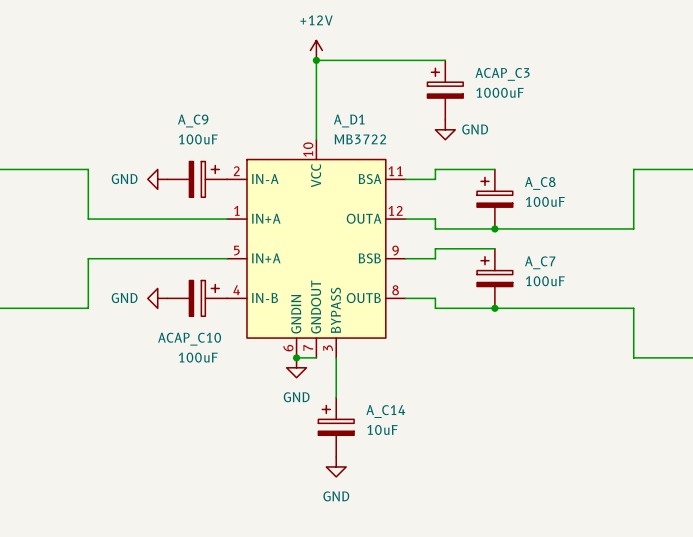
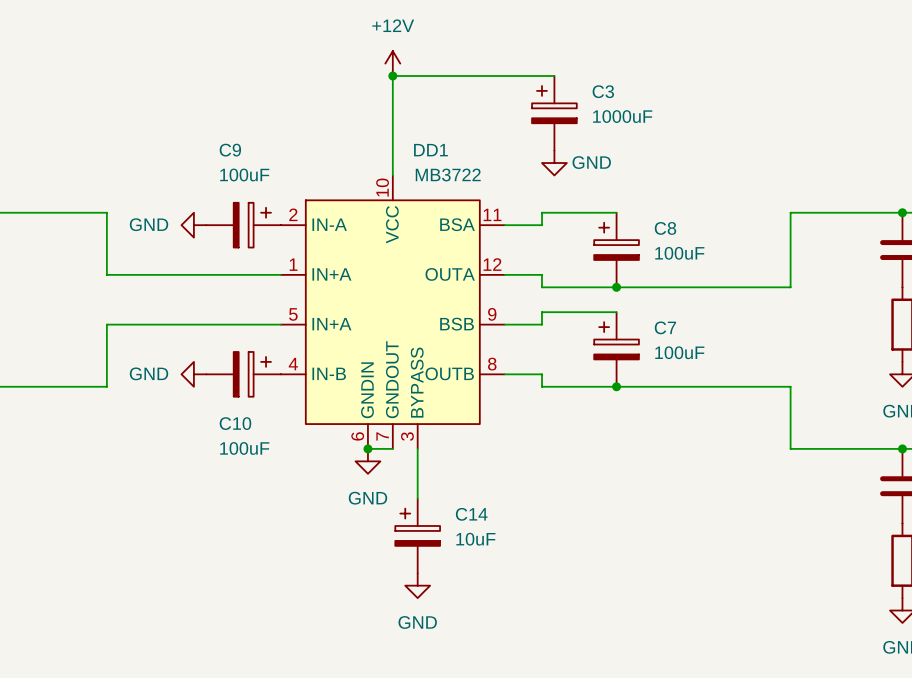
ACAP_C3 name: ACAP_C3 (502, 74) -> C3 (603, 91)
A_C9 name: A_C9 (193, 120) -> C9 (230, 150)
A_D1 name: A_D1 (349, 120) -> DD1 (430, 150)
A_C8 name: A_C8 (540, 183) -> C8 (665, 228)
A_C7 name: A_C7 (540, 262) -> C7 (665, 327)
ACAP_C10 name: ACAP_C10 (189, 339) -> C10 (235, 423)
A_C14 name: A_C14 (385, 411) -> C14 (471, 514)

